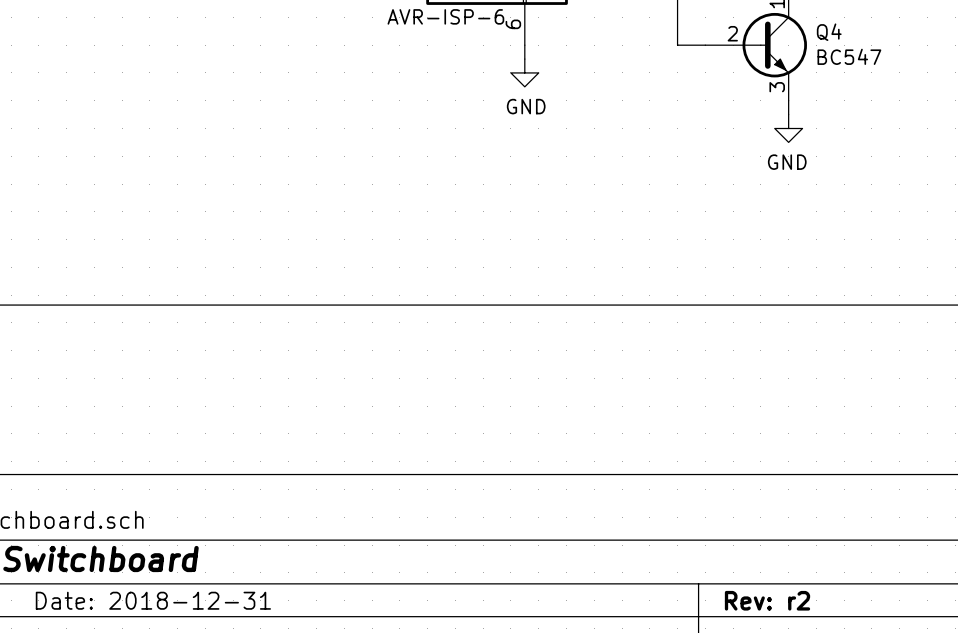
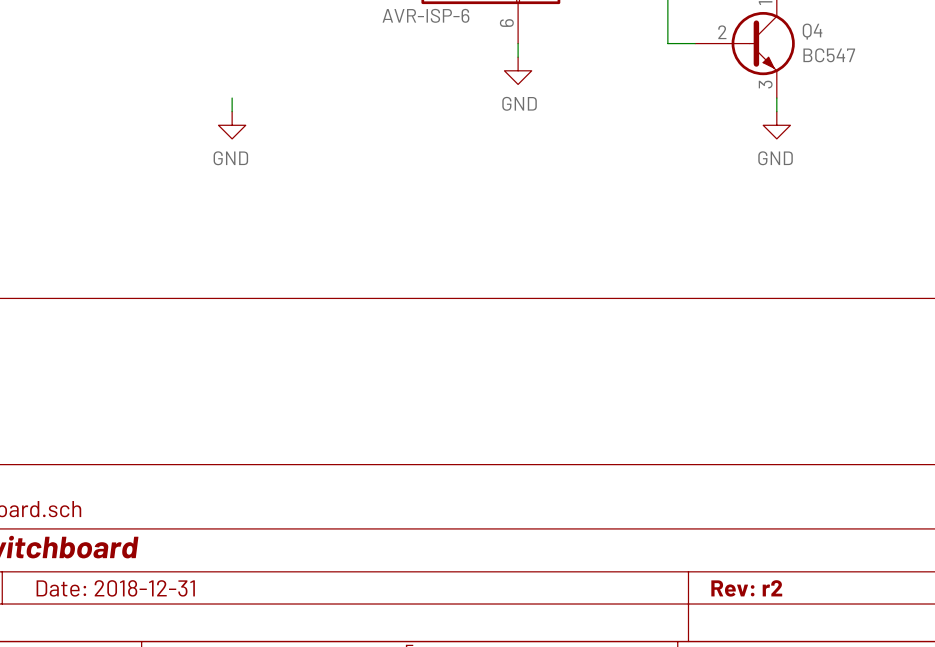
wire: none -> (232, 98) (232, 111)
power symbol: none -> GND (232, 125)

